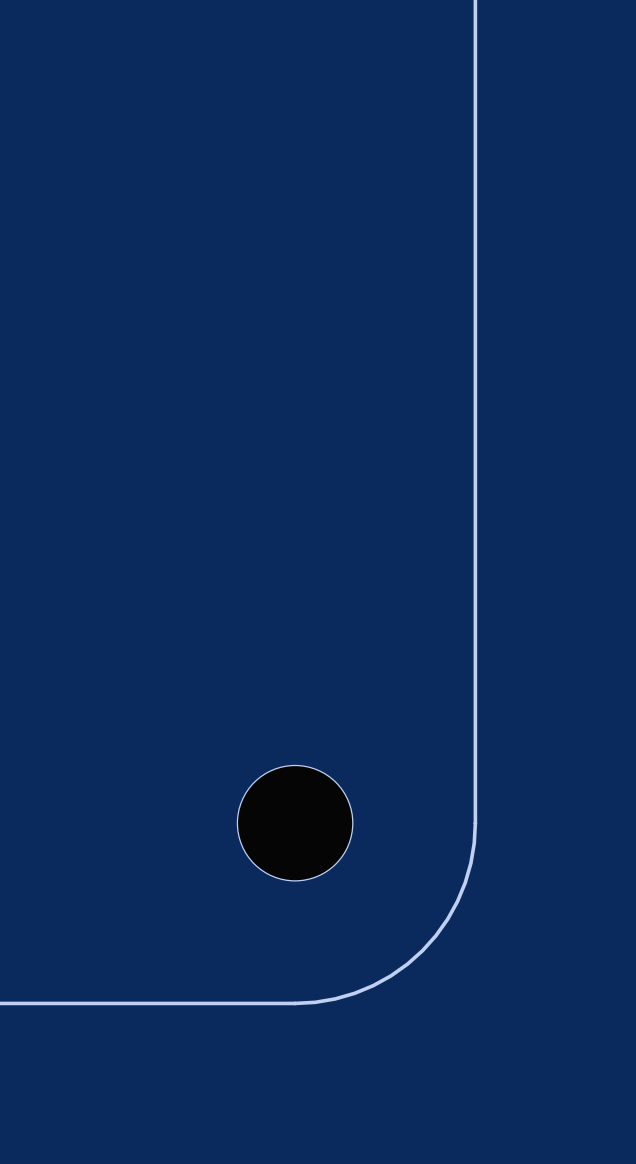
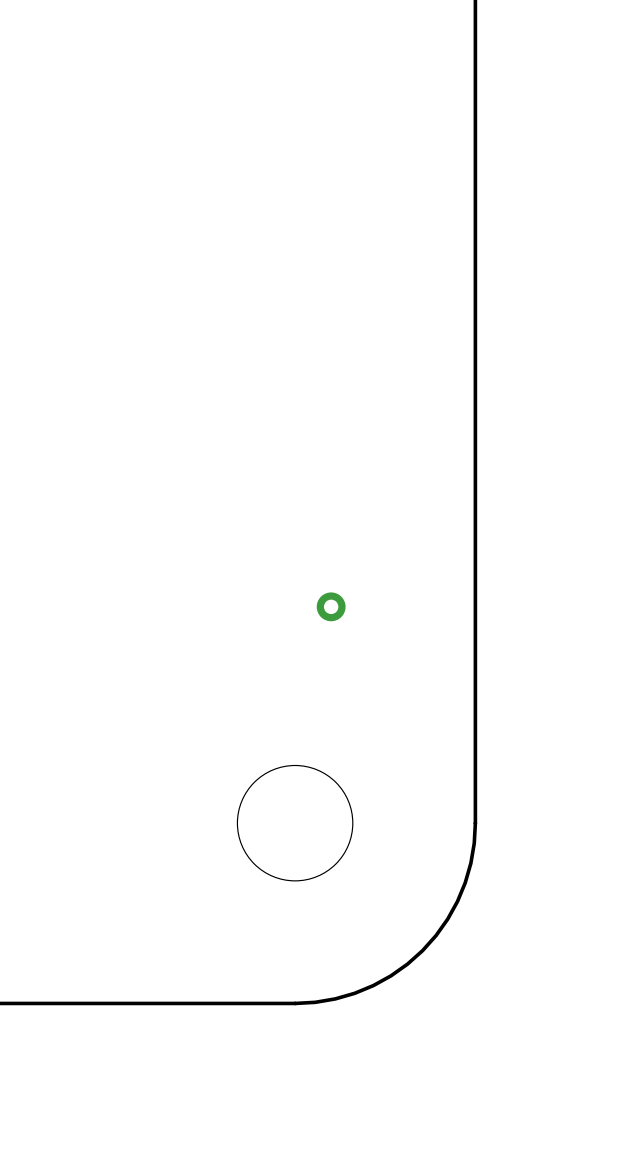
via: none -> (331, 606)

